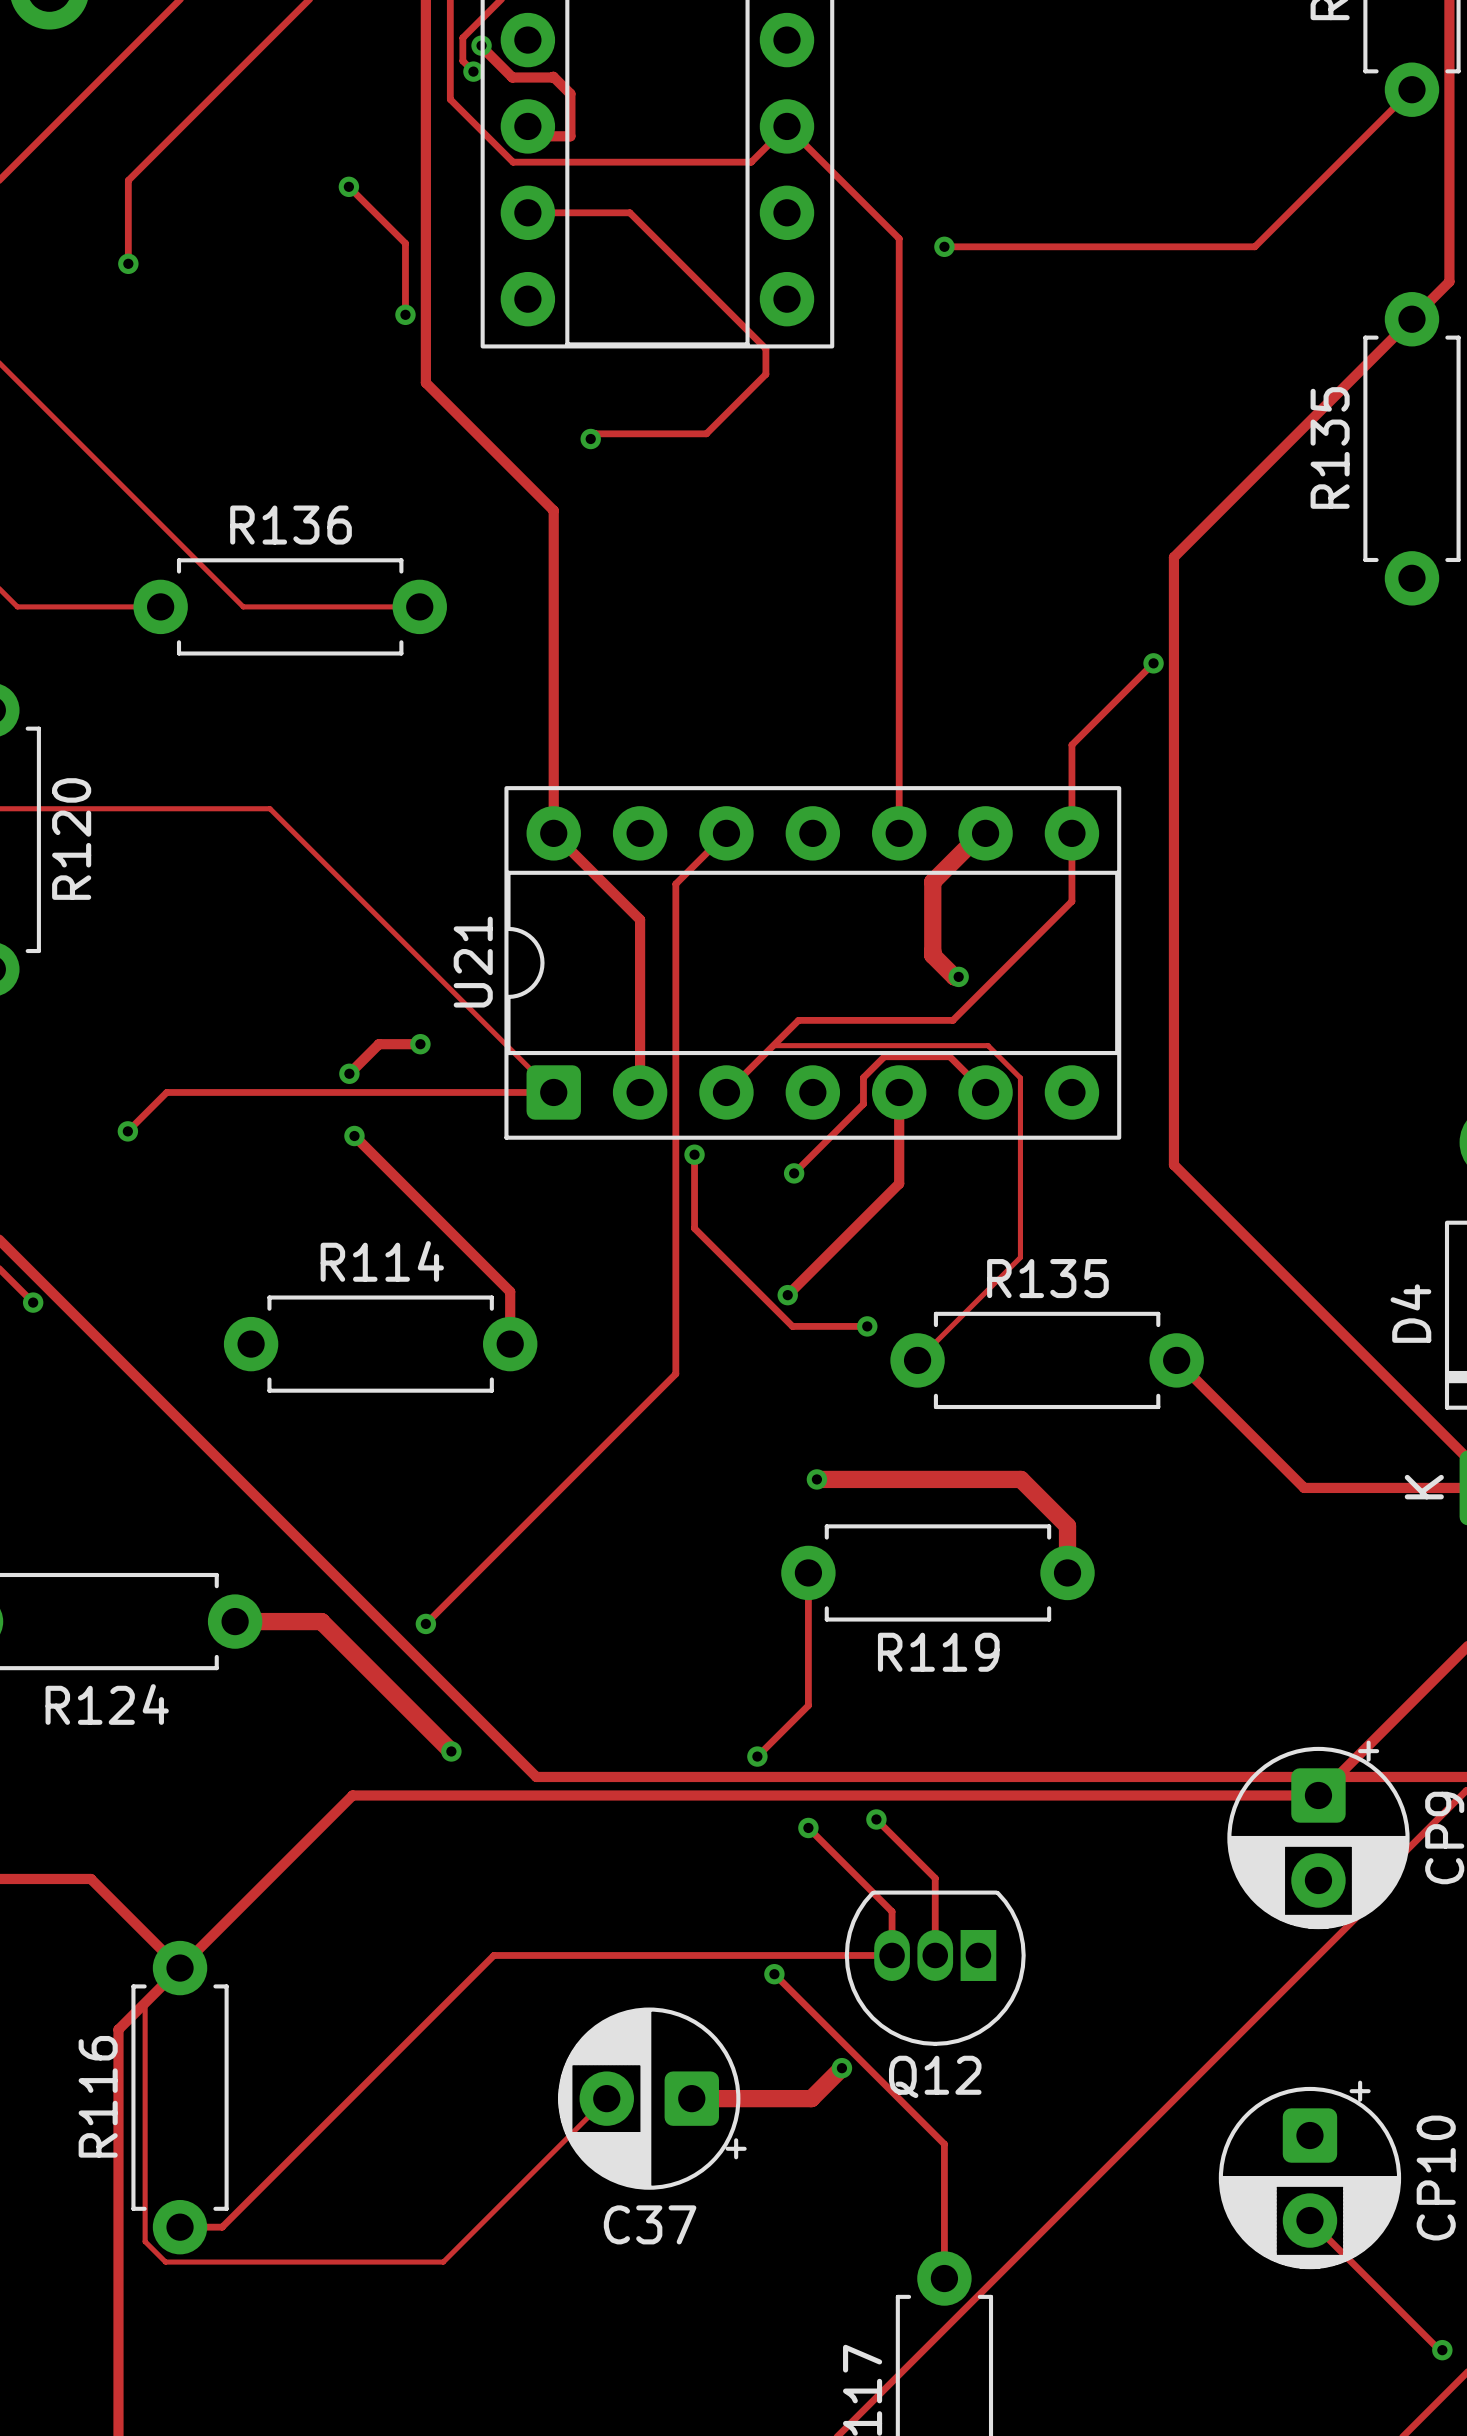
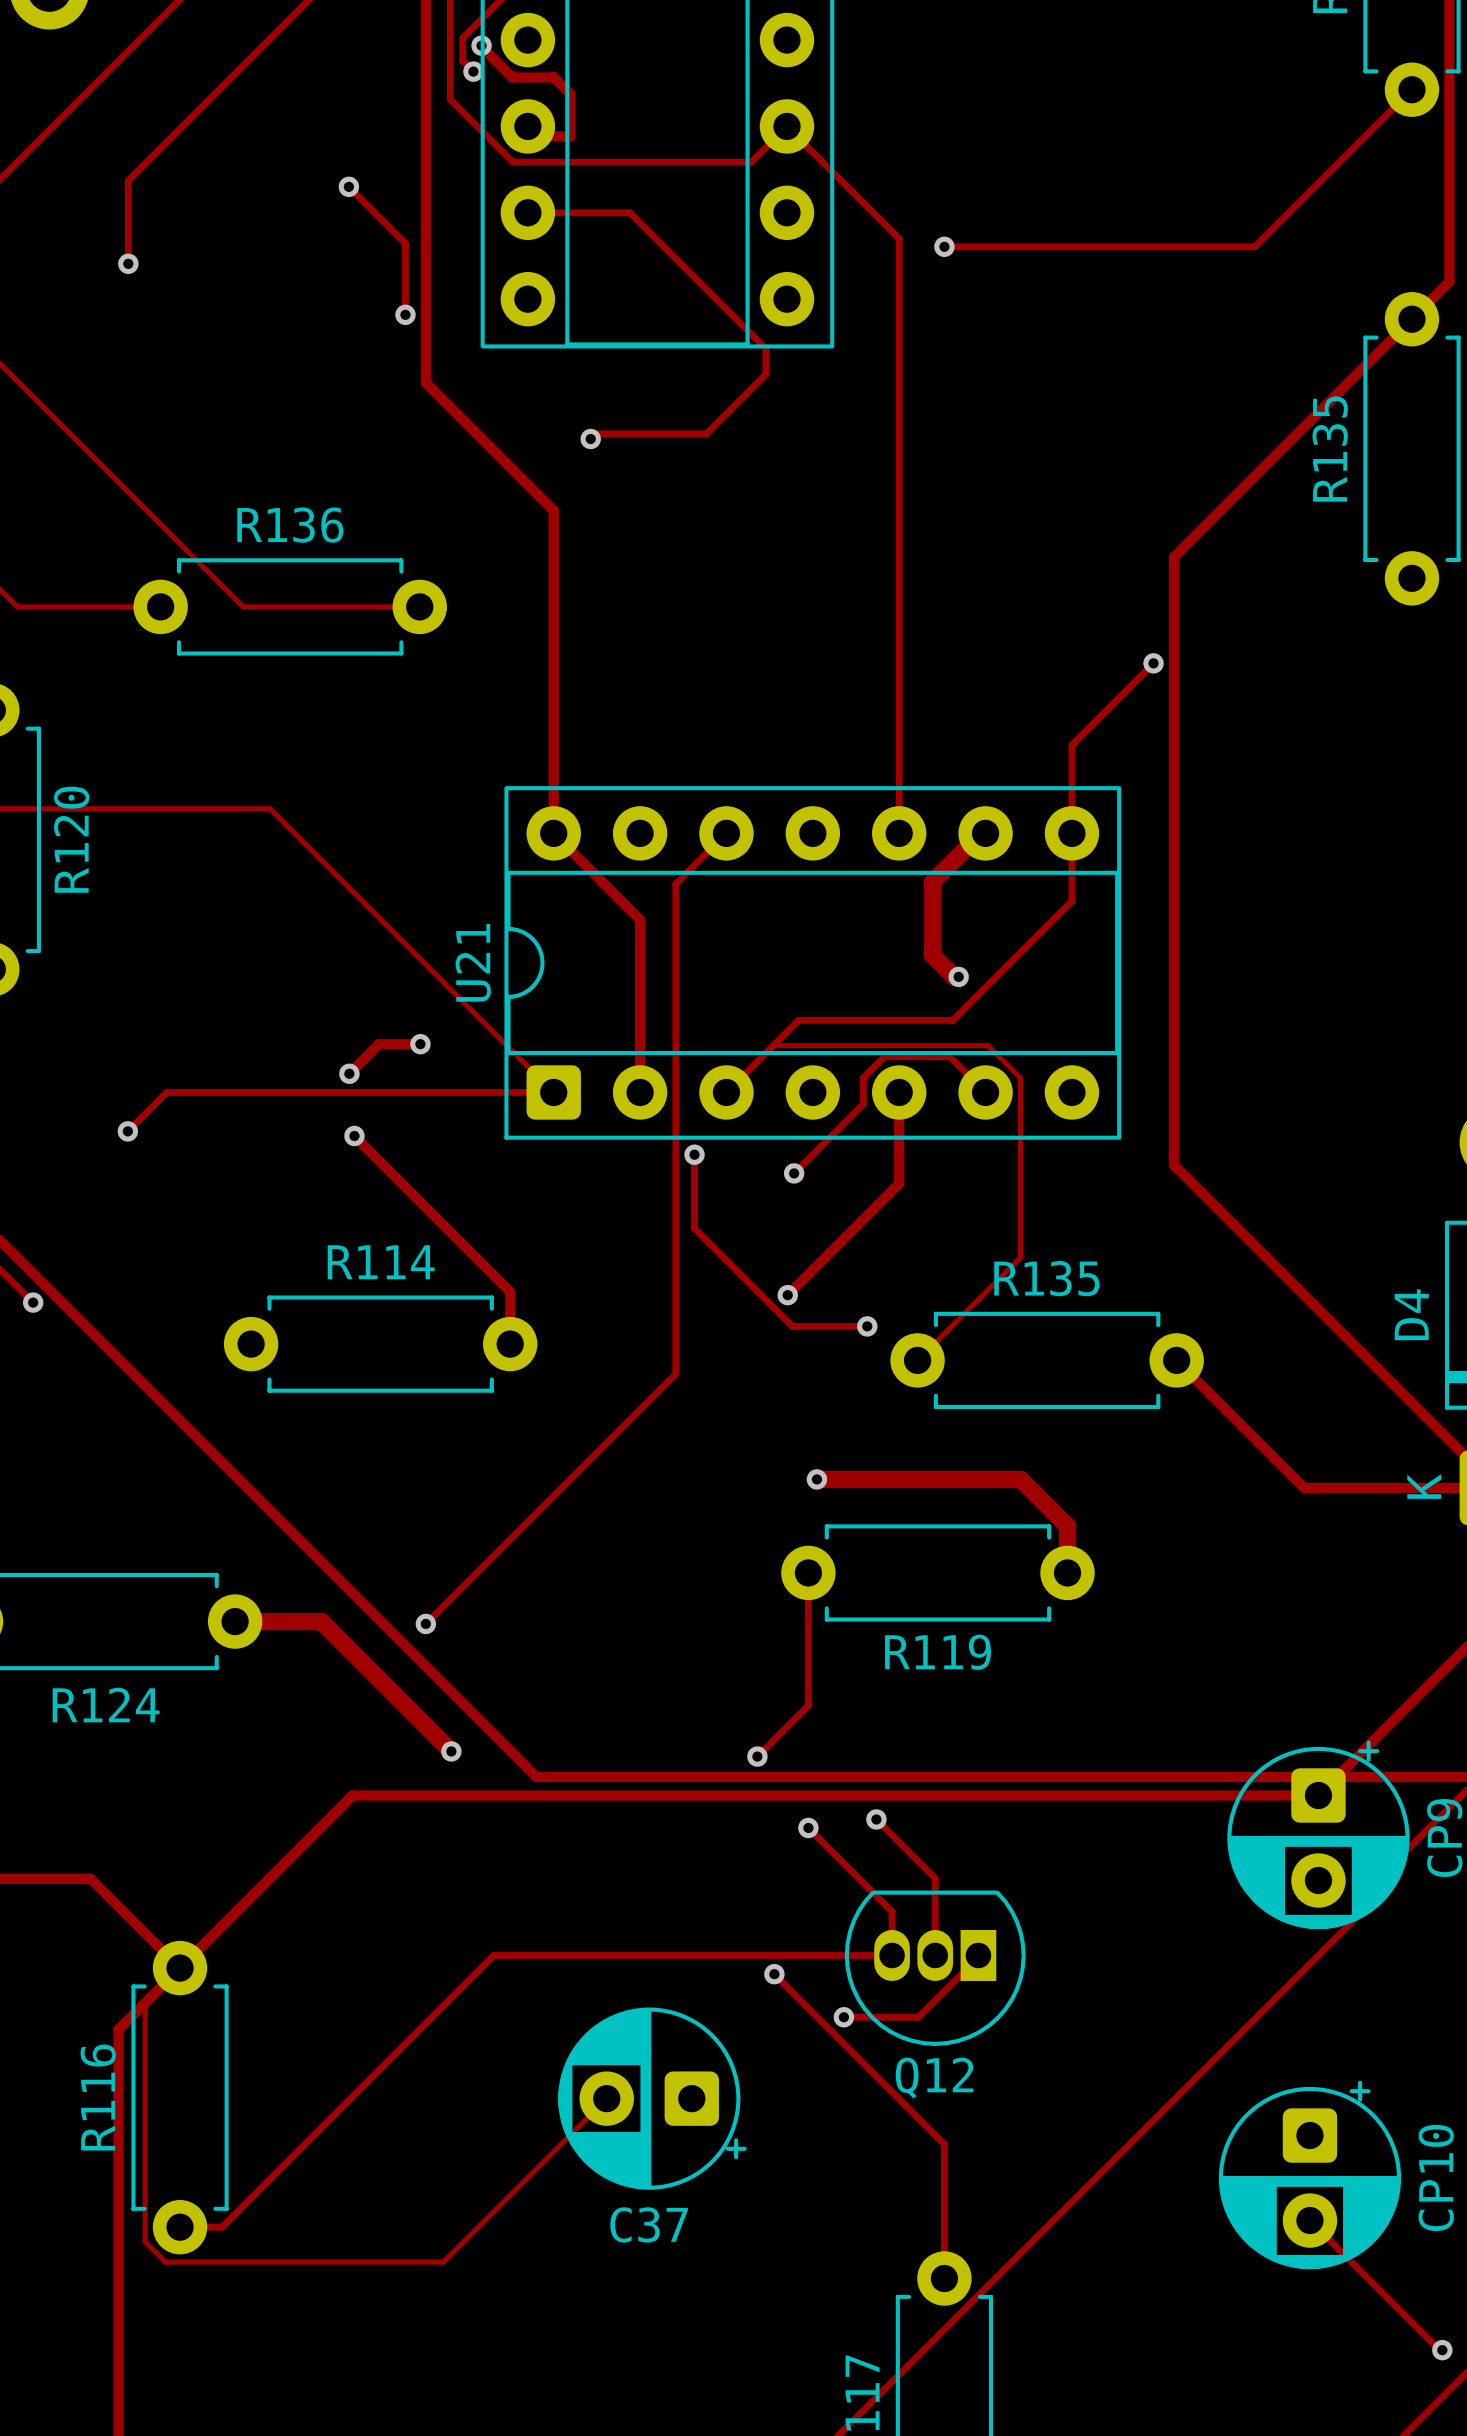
track: none -> (978, 1957) (918, 2017) (843, 2017)
track: (841, 2068) (811, 2098) (691, 2098) -> none
via position: (841, 2068) -> (843, 2017)

